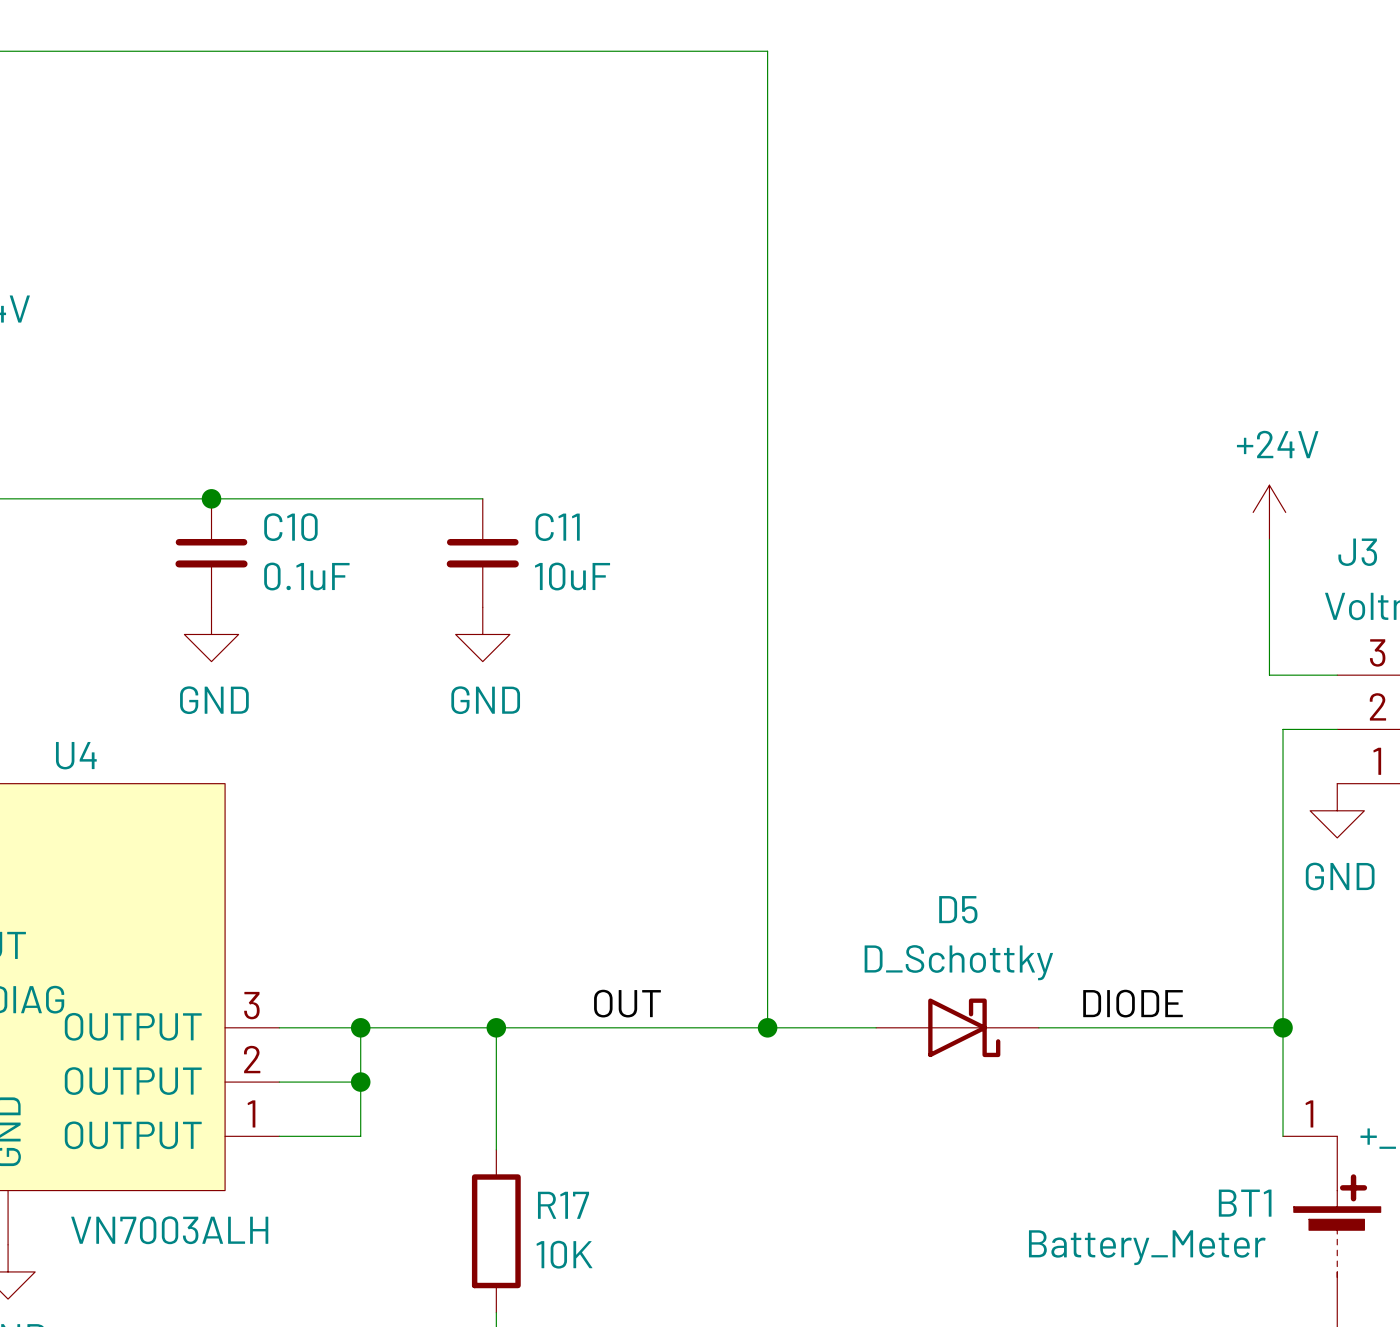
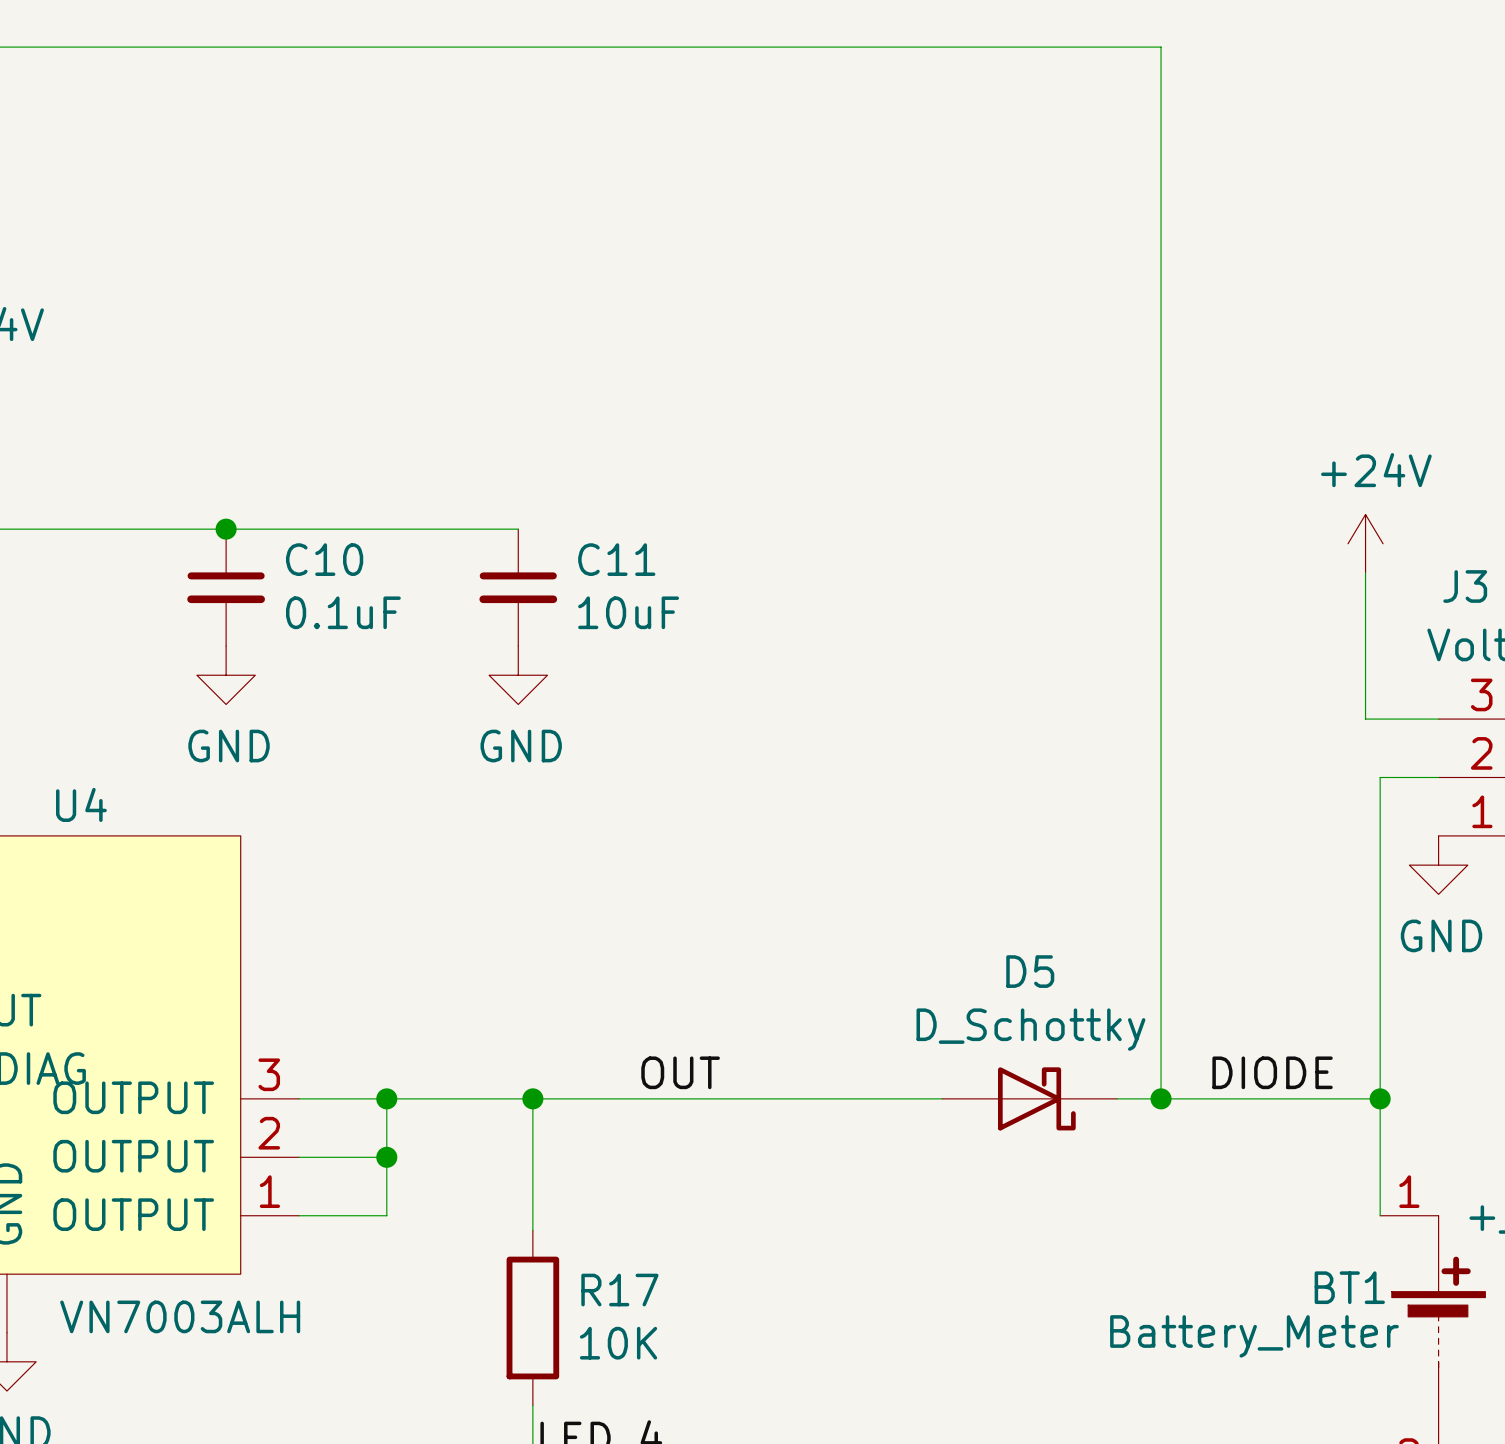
wire: (767, 51) (767, 1027) -> (825, 47) (1161, 47) (1161, 1098)
label position: DIODE (1133, 1003) -> DIODE (1272, 1072)
junction: (767, 1027) -> none
junction: none -> (1161, 1098)

